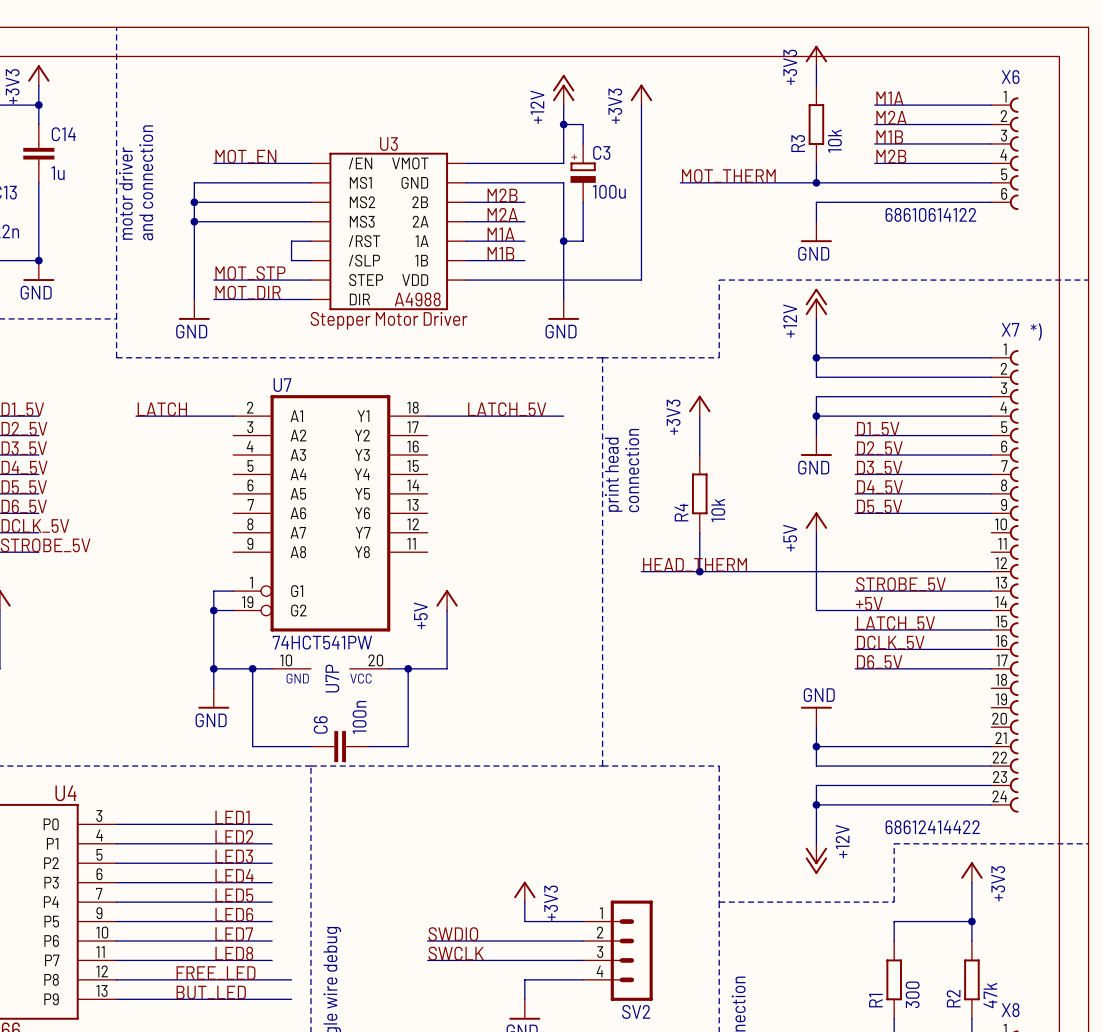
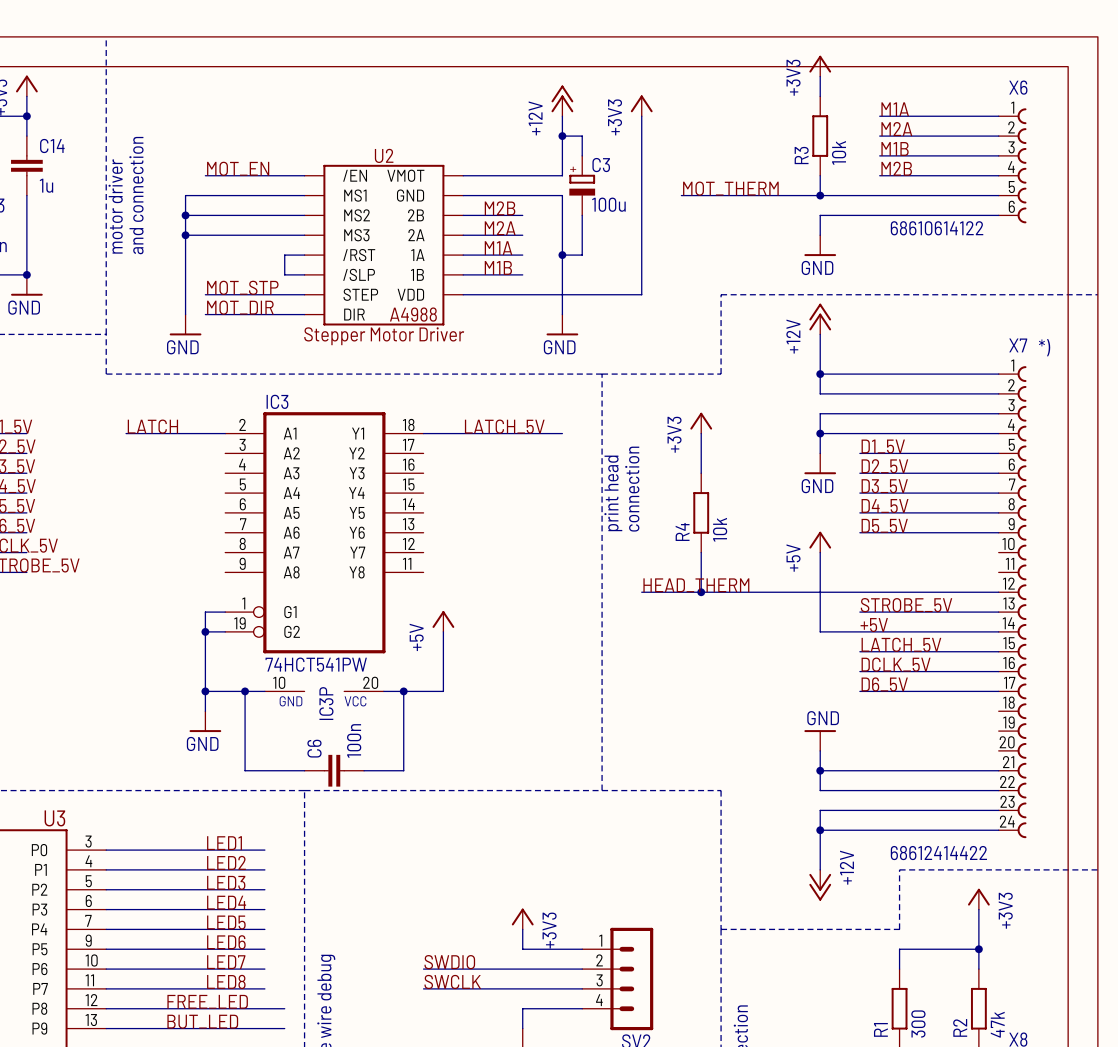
U3 name: U3 (388, 144) -> U2 (384, 155)
U7 name: U7 (282, 385) -> IC3 (277, 401)
U7P name: U7P (332, 678) -> IC3P (326, 703)
U4 name: U4 (65, 793) -> U3 (54, 818)

